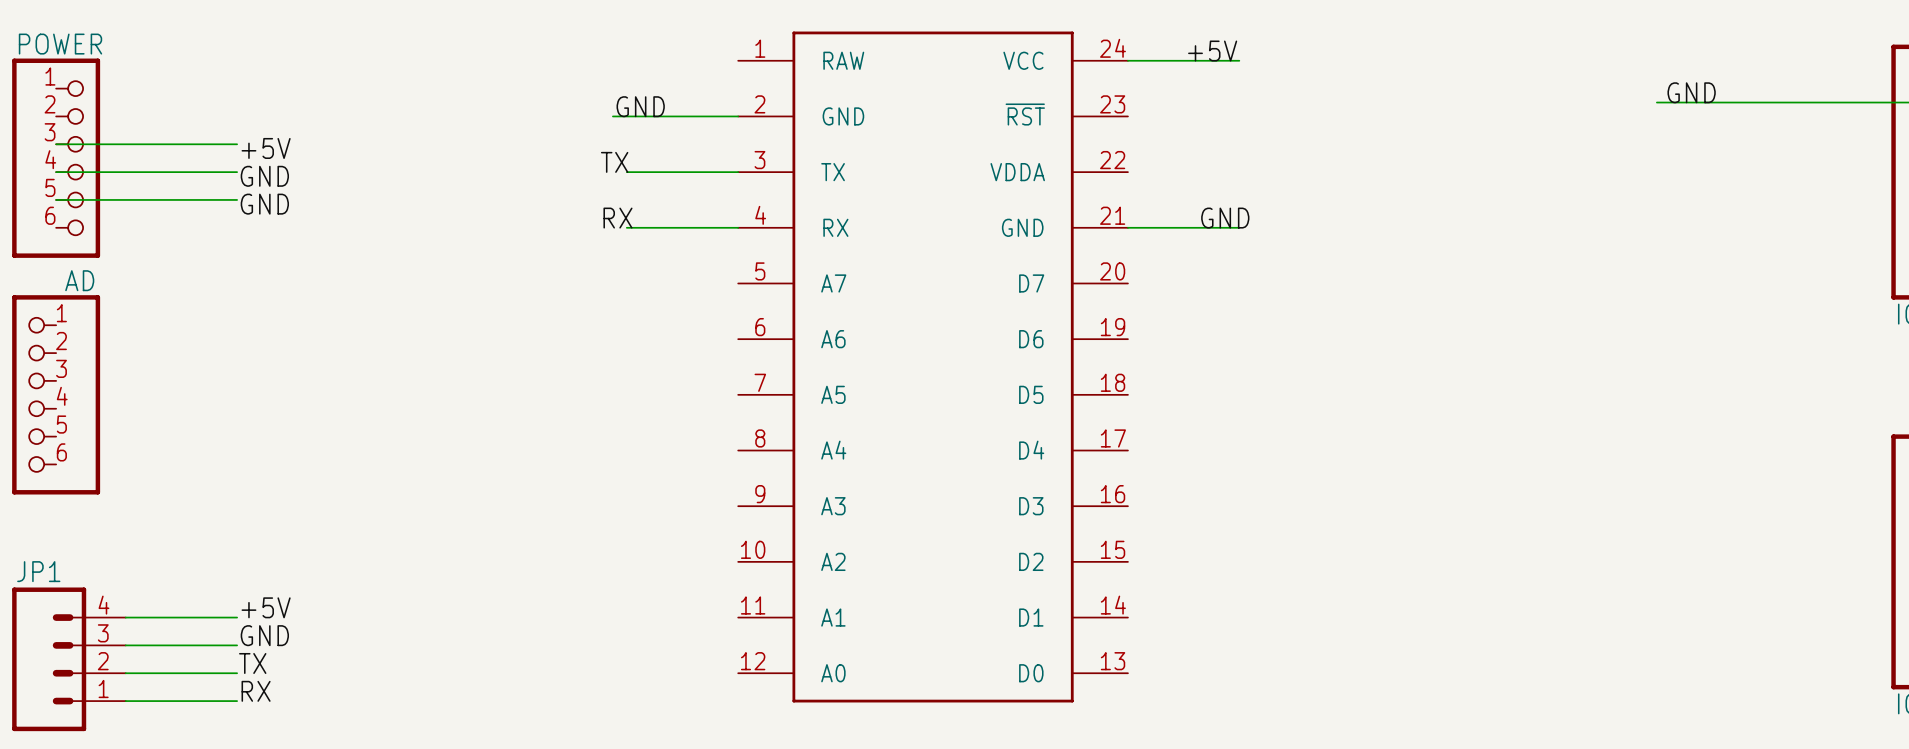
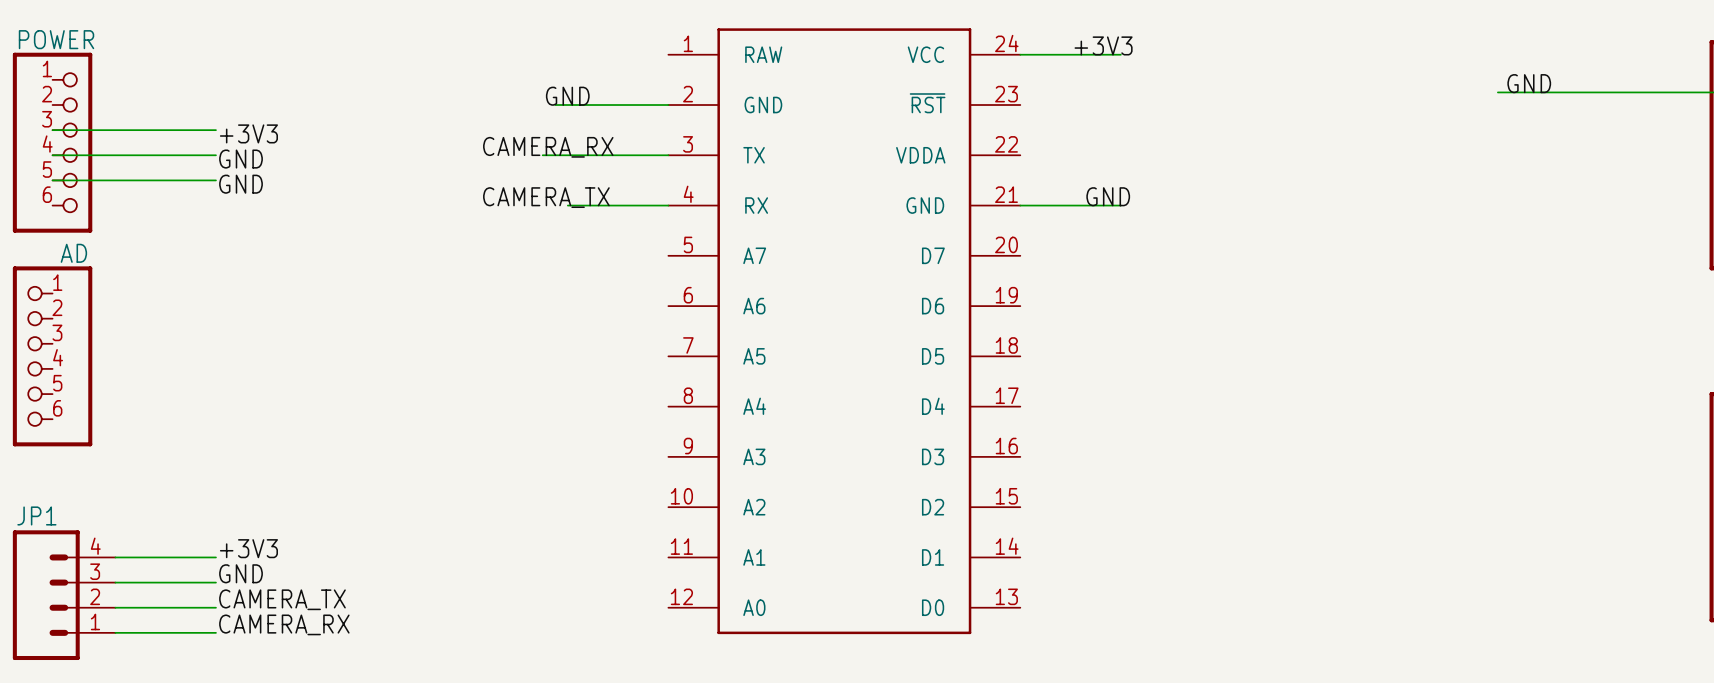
label: +5V (1212, 51) -> +3V3 (1103, 45)
label position: GND (640, 106) -> GND (567, 96)
label: +5V (266, 148) -> +3V3 (248, 133)
label: TX (614, 162) -> none
label: none -> CAMERA_RX (548, 147)
wire: none -> (542, 155) (567, 155)
label: none -> CAMERA_TX (546, 197)
label: RX (617, 218) -> none
label: +5V (266, 607) -> +3V3 (248, 548)
label: TX (252, 663) -> CAMERA_TX (282, 599)
label: RX (256, 691) -> CAMERA_RX (284, 624)

